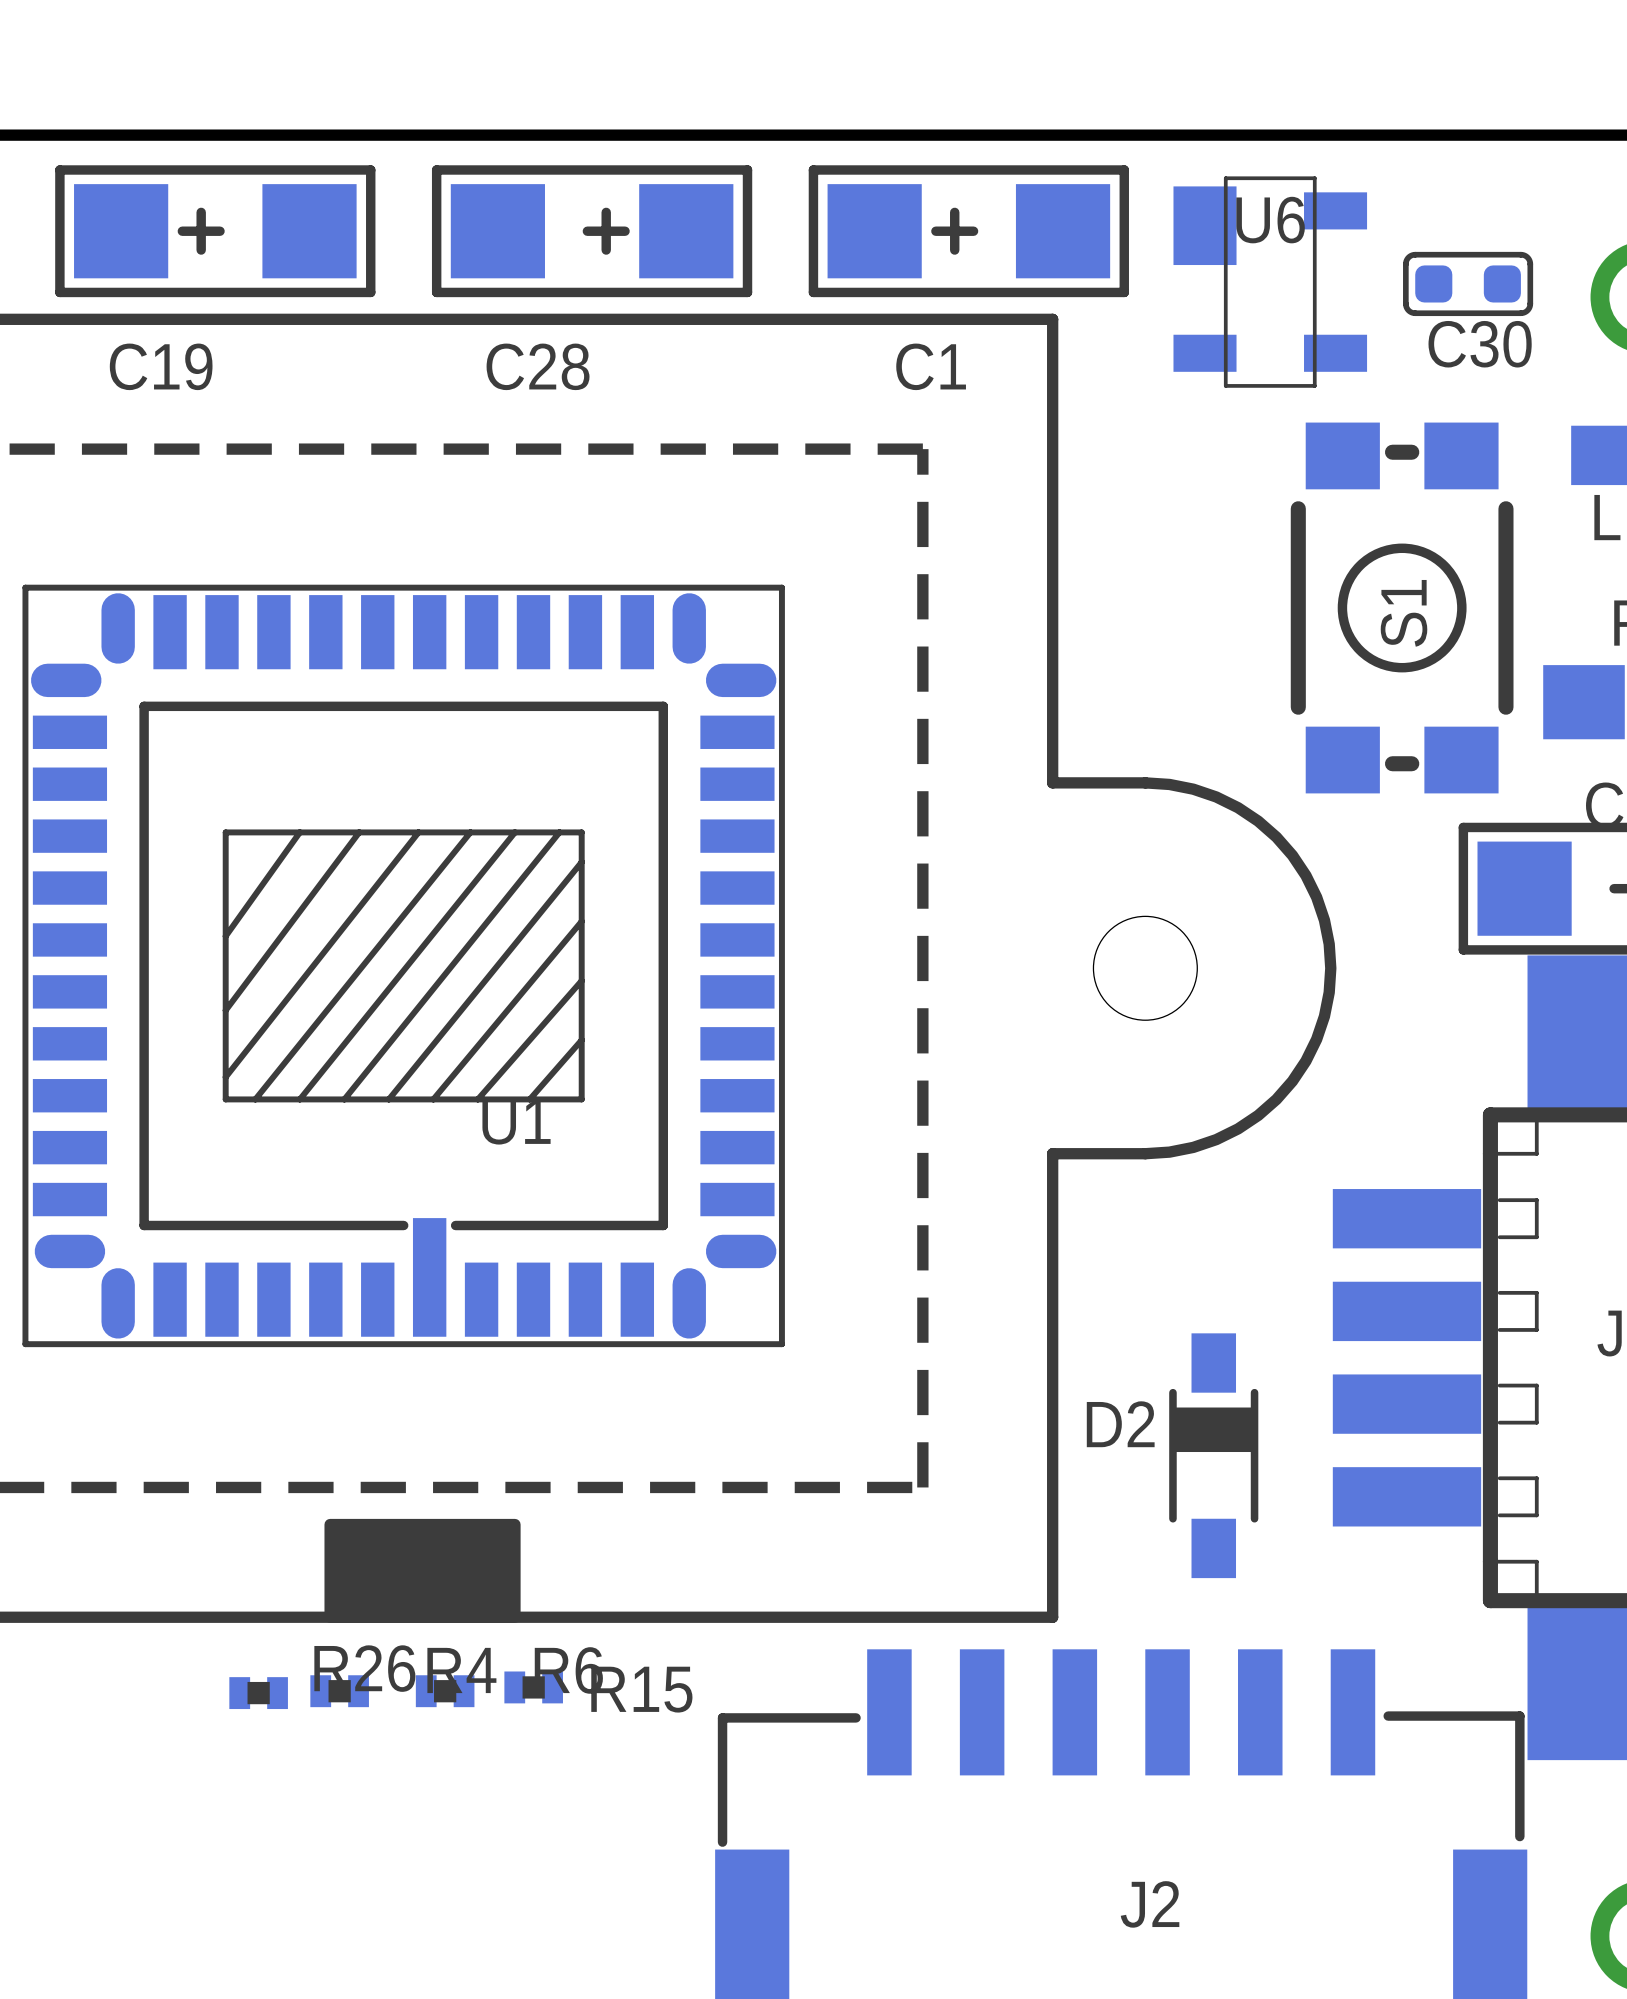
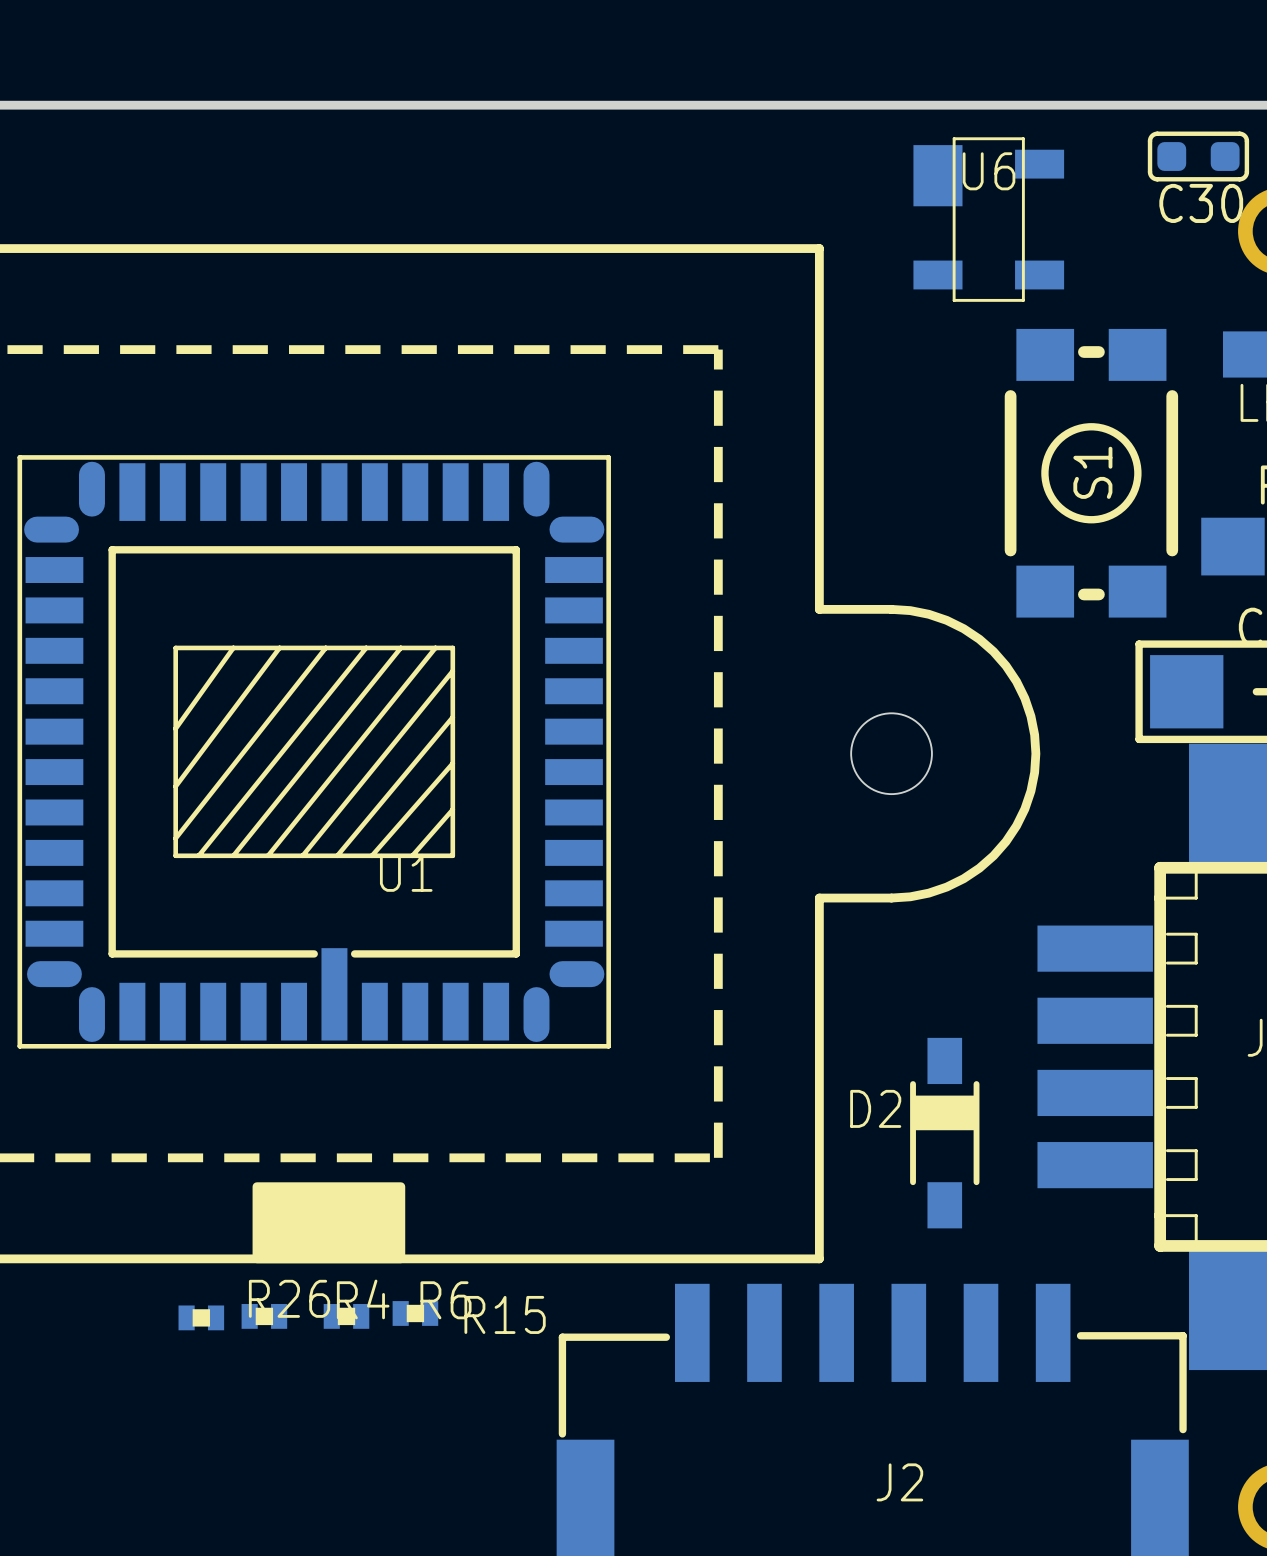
C19: (215, 231) -> none
C28: (592, 231) -> none
C1: (968, 231) -> none
C30 position: (1468, 283) -> (1198, 156)

